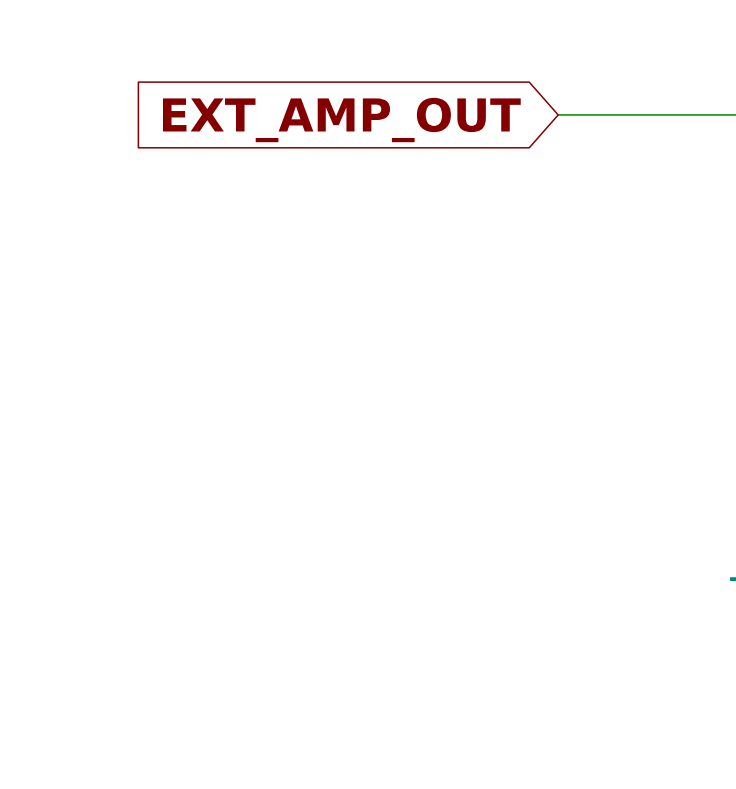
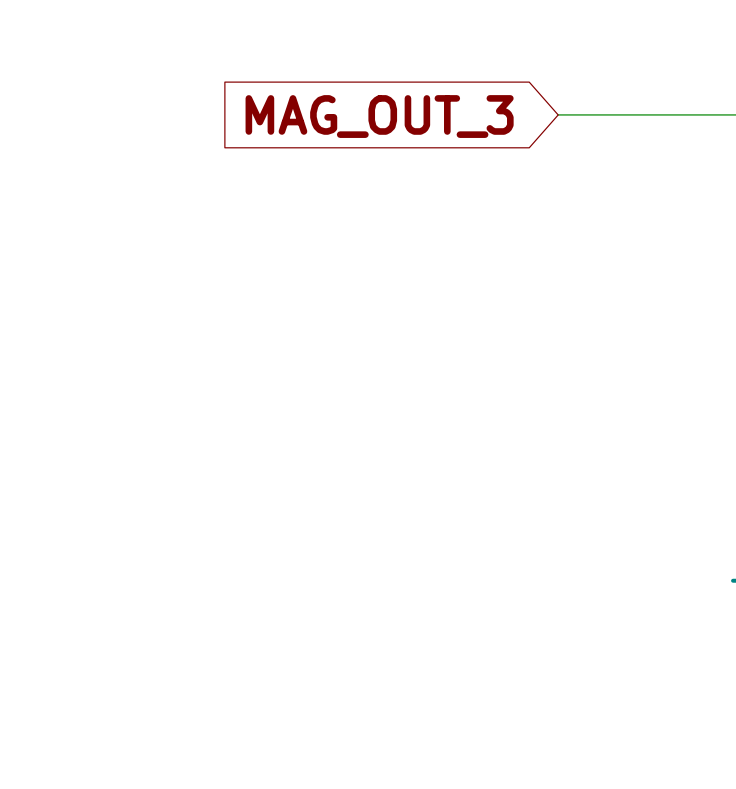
global label: EXT_AMP_OUT (341, 120) -> MAG_OUT_3 (379, 116)

